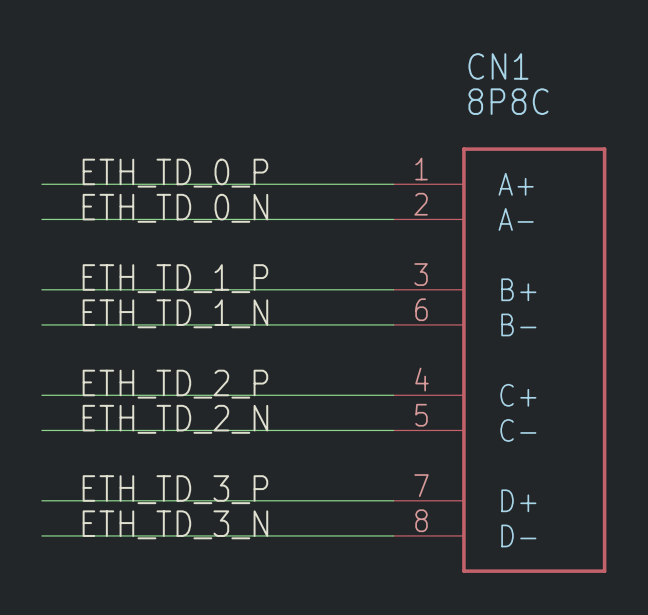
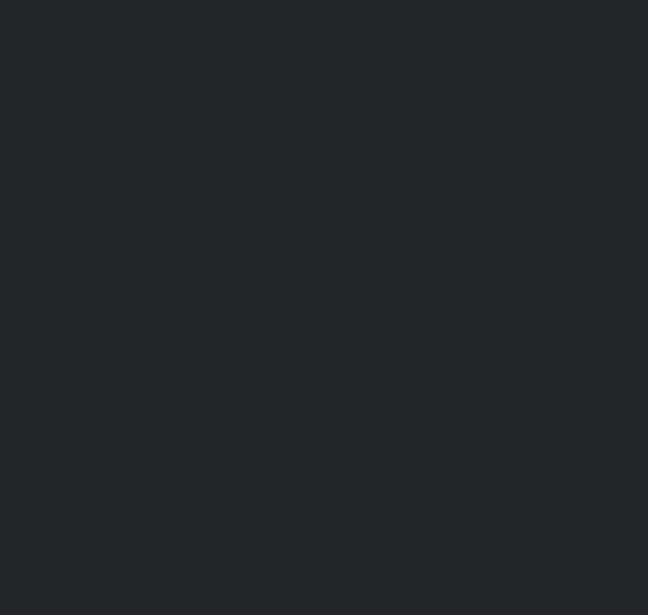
label: ETH_TD_0_P (175, 173) -> none
wire: (41, 184) (393, 184) -> none
label: ETH_TD_0_N (175, 208) -> none
wire: (41, 219) (393, 219) -> none
label: ETH_TD_1_P (175, 278) -> none
wire: (41, 289) (393, 289) -> none
label: ETH_TD_1_N (175, 313) -> none
wire: (41, 324) (393, 324) -> none
CN1: 8P8C (499, 360) -> none
label: ETH_TD_2_P (175, 384) -> none
wire: (41, 395) (393, 395) -> none
label: ETH_TD_2_N (175, 419) -> none
wire: (41, 430) (393, 430) -> none
label: ETH_TD_3_P (175, 489) -> none
wire: (41, 500) (393, 500) -> none
label: ETH_TD_3_N (175, 524) -> none
wire: (41, 535) (393, 535) -> none

